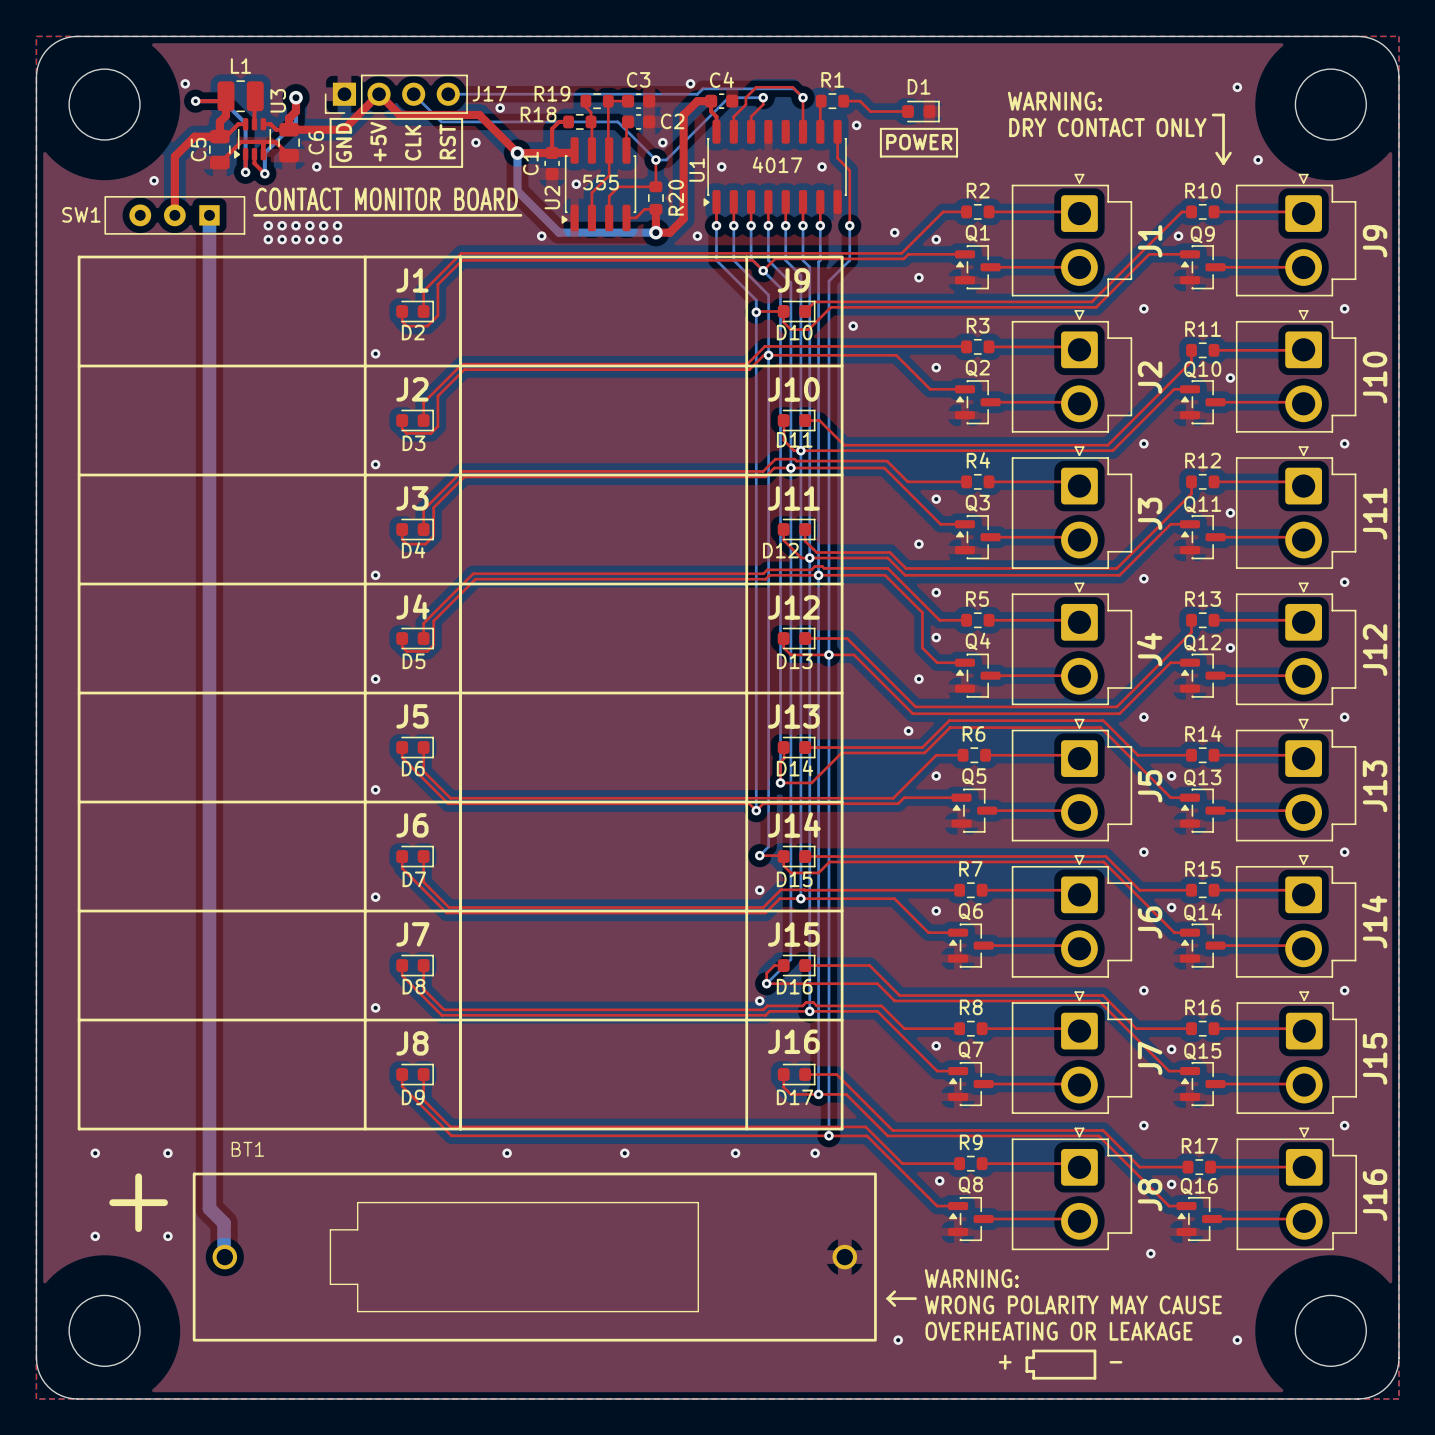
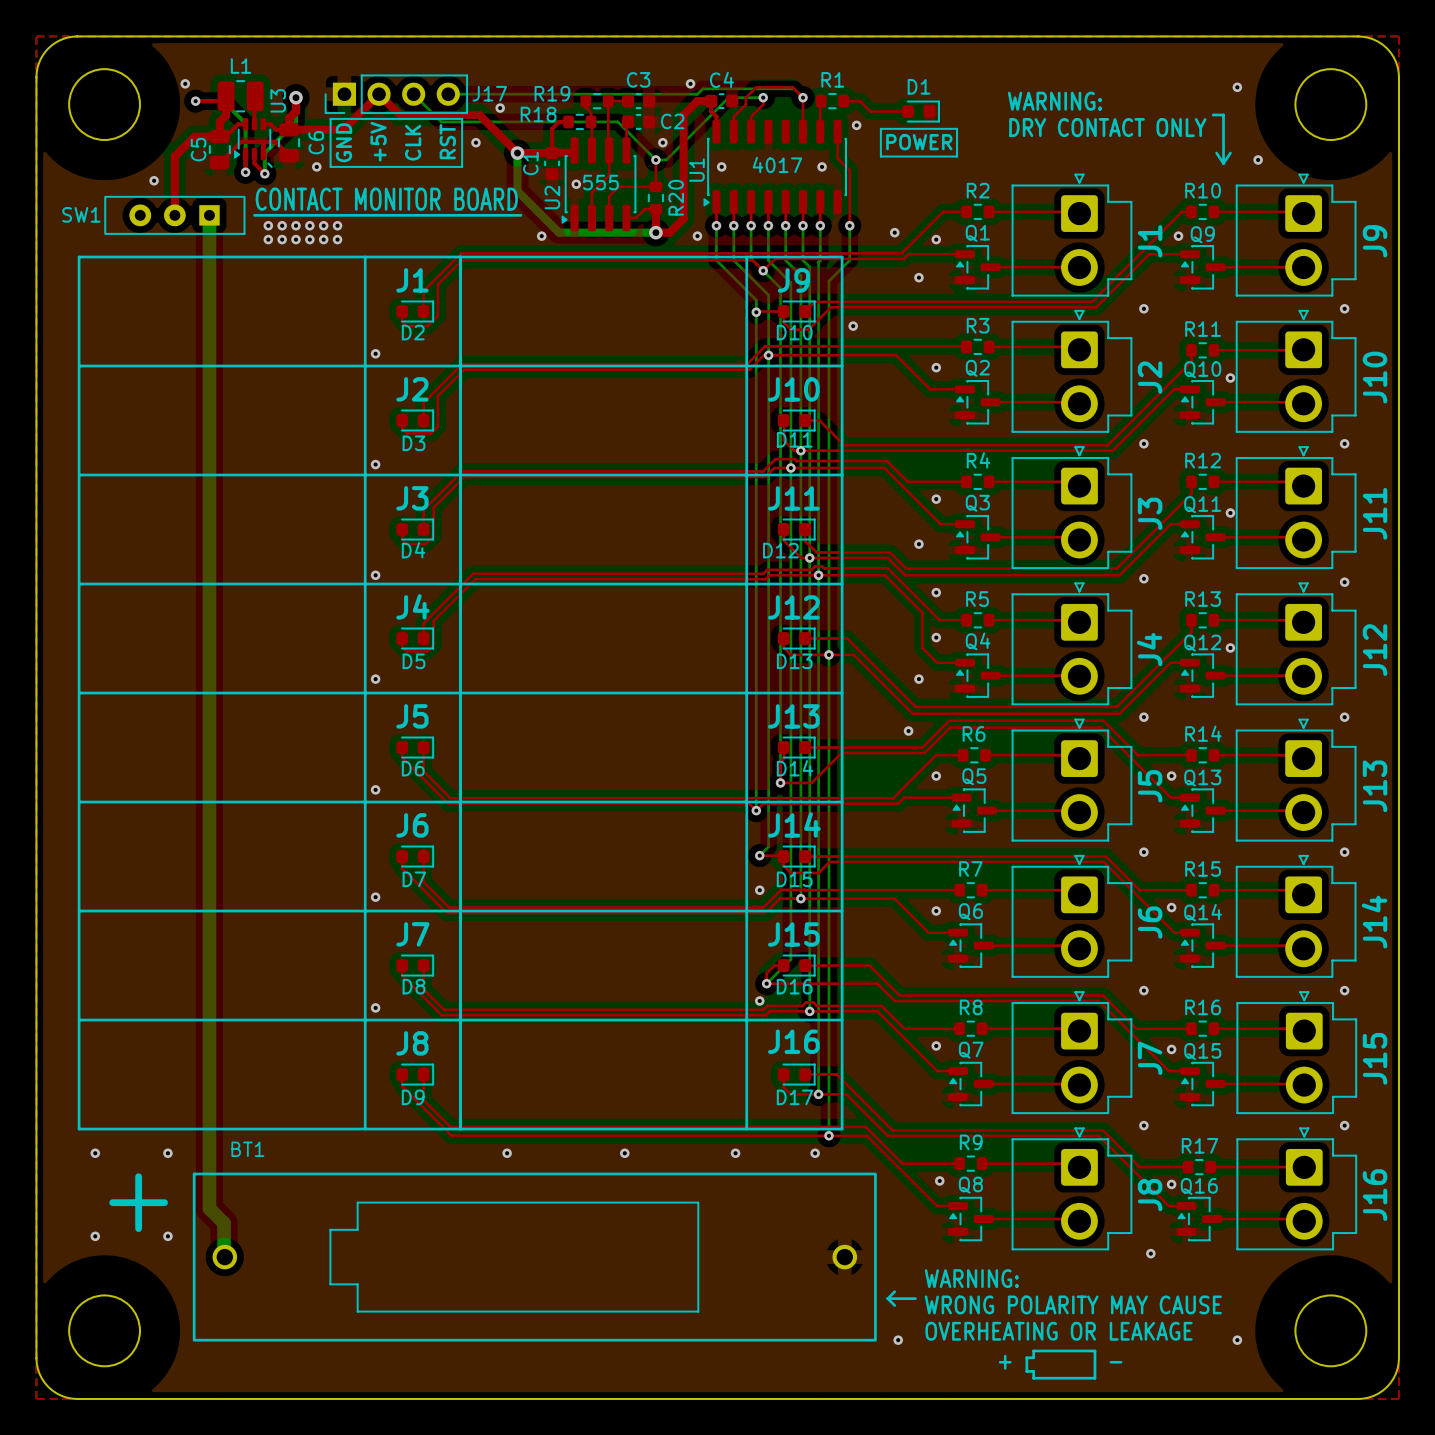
line: none -> (268, 163) (271, 166)

